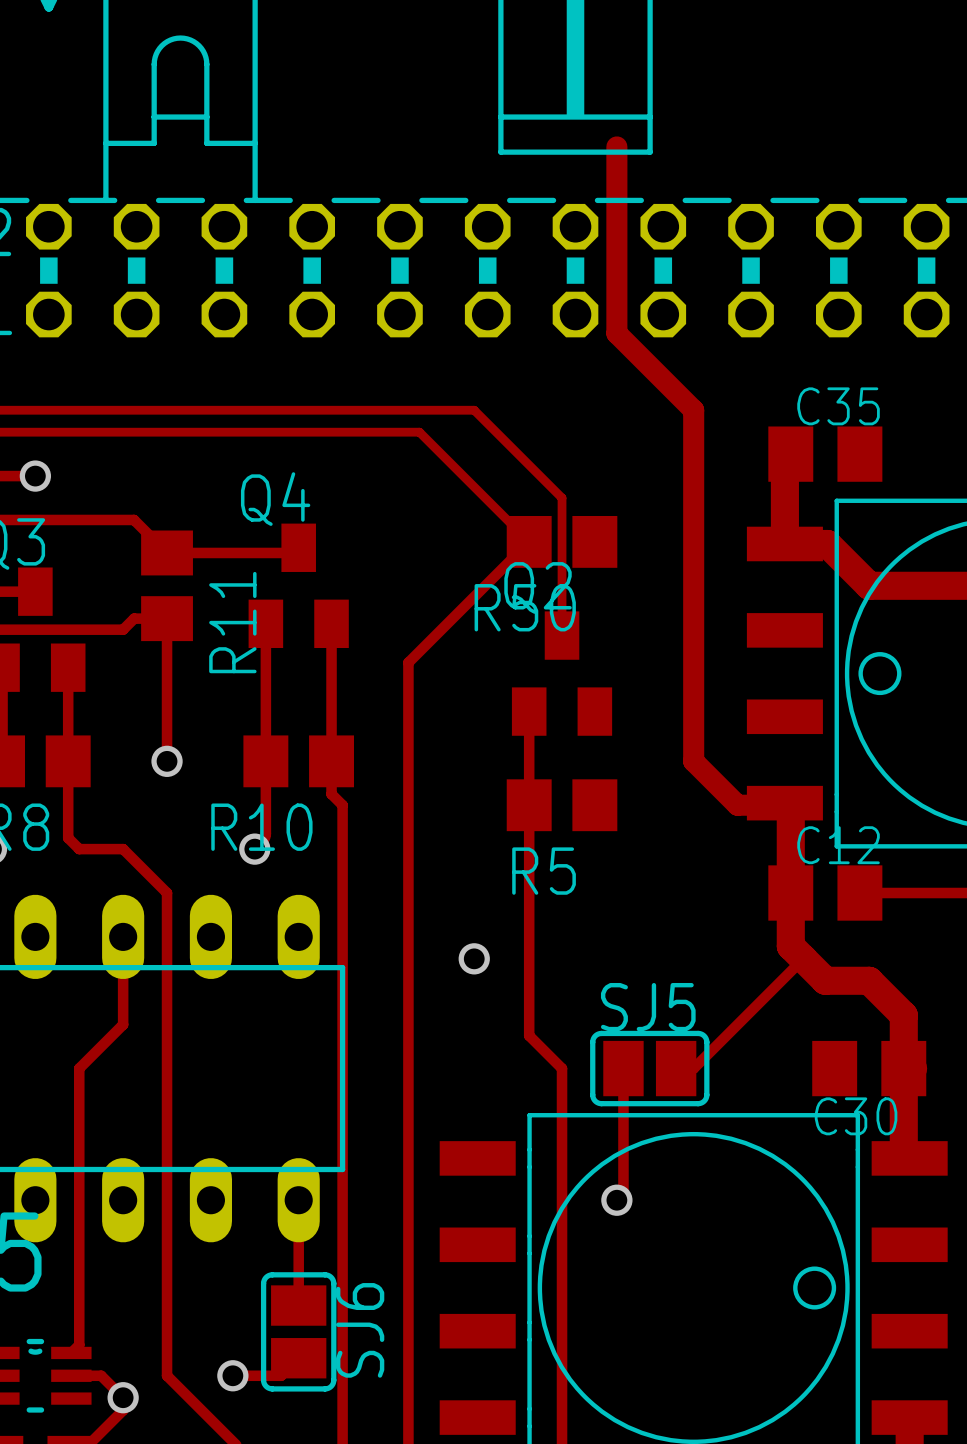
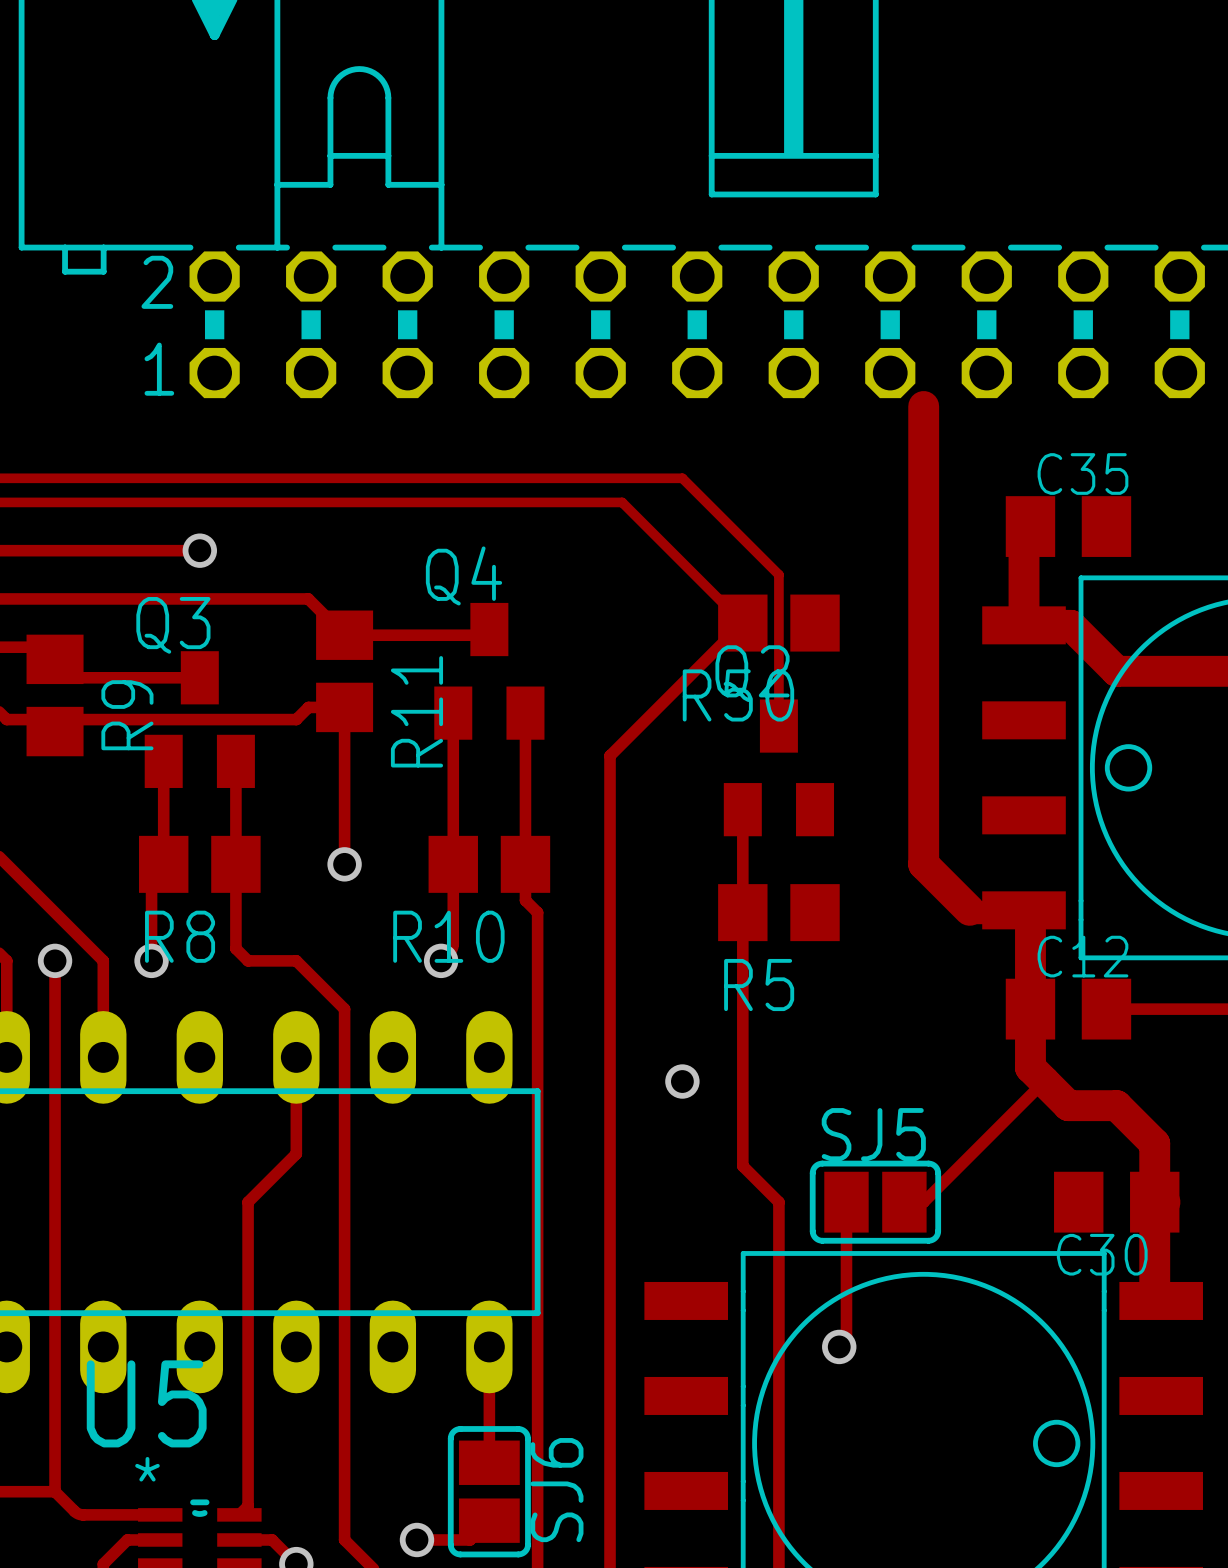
track: (616, 146) (616, 333) (693, 410) -> (923, 406) (923, 478)
track width: thin (693, 410) (693, 761) (735, 803) -> thick (923, 478) (923, 864) (969, 910)

